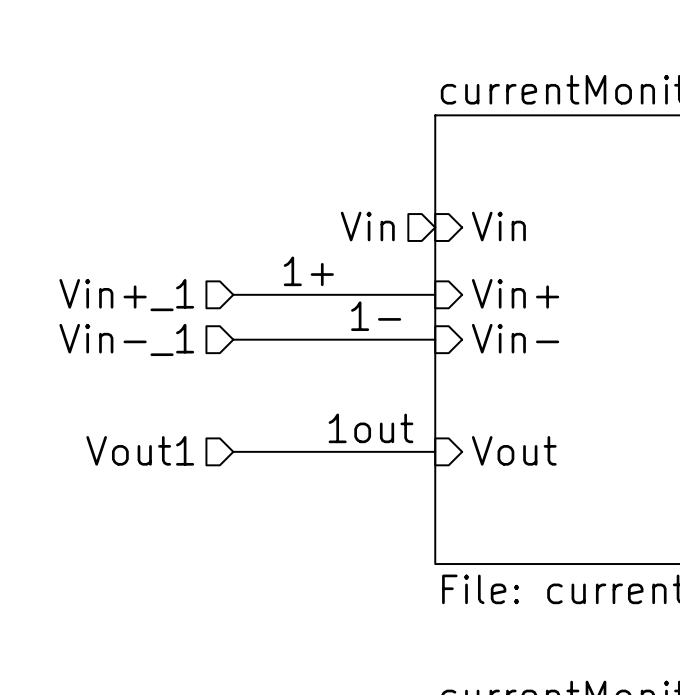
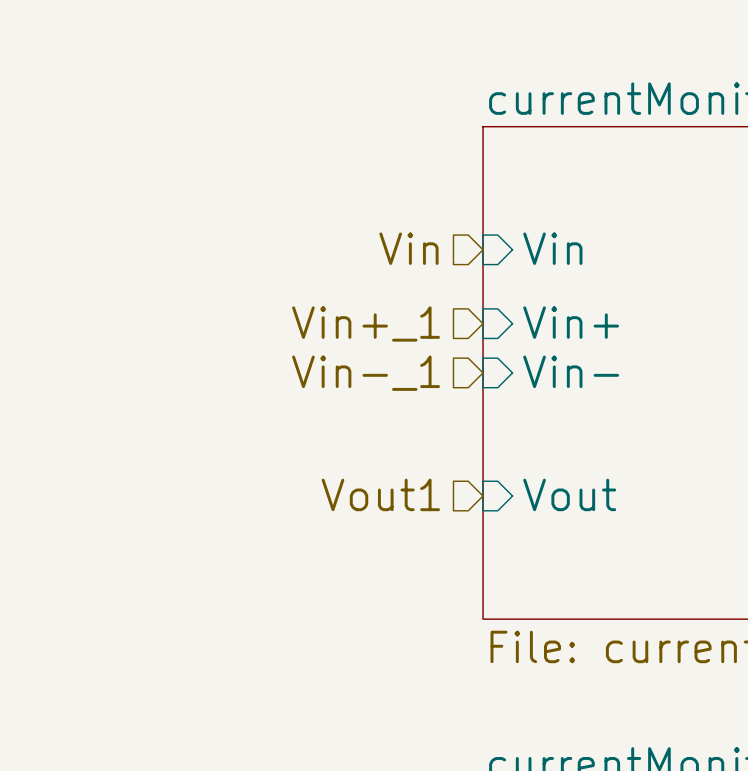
label: 1+ (308, 271) -> none
wire: (233, 294) (435, 294) -> none
hierarchical label position: Vin+_1 (126, 295) -> Vin+_1 (366, 323)
label: 1- (376, 316) -> none
hierarchical label position: Vin-_1 (126, 339) -> Vin-_1 (366, 373)
wire: (233, 339) (435, 339) -> none
label: 1out (371, 428) -> none
hierarchical label position: Vout1 (140, 450) -> Vout1 (380, 494)
wire: (233, 451) (435, 451) -> none

